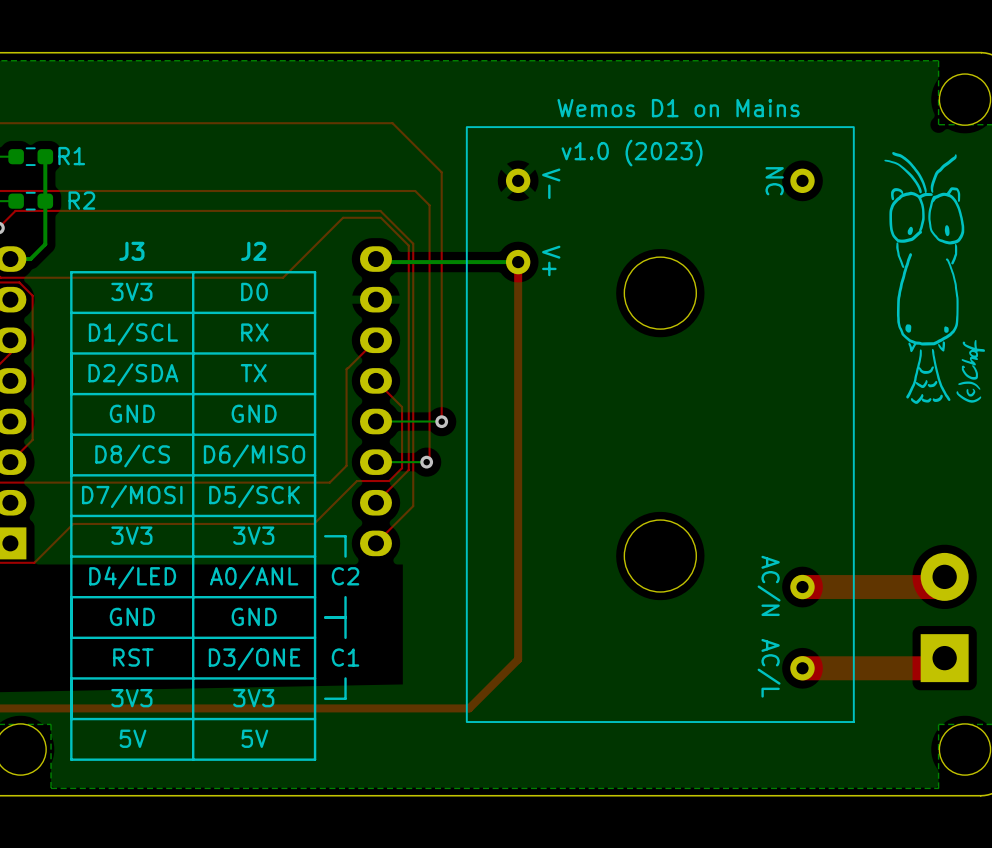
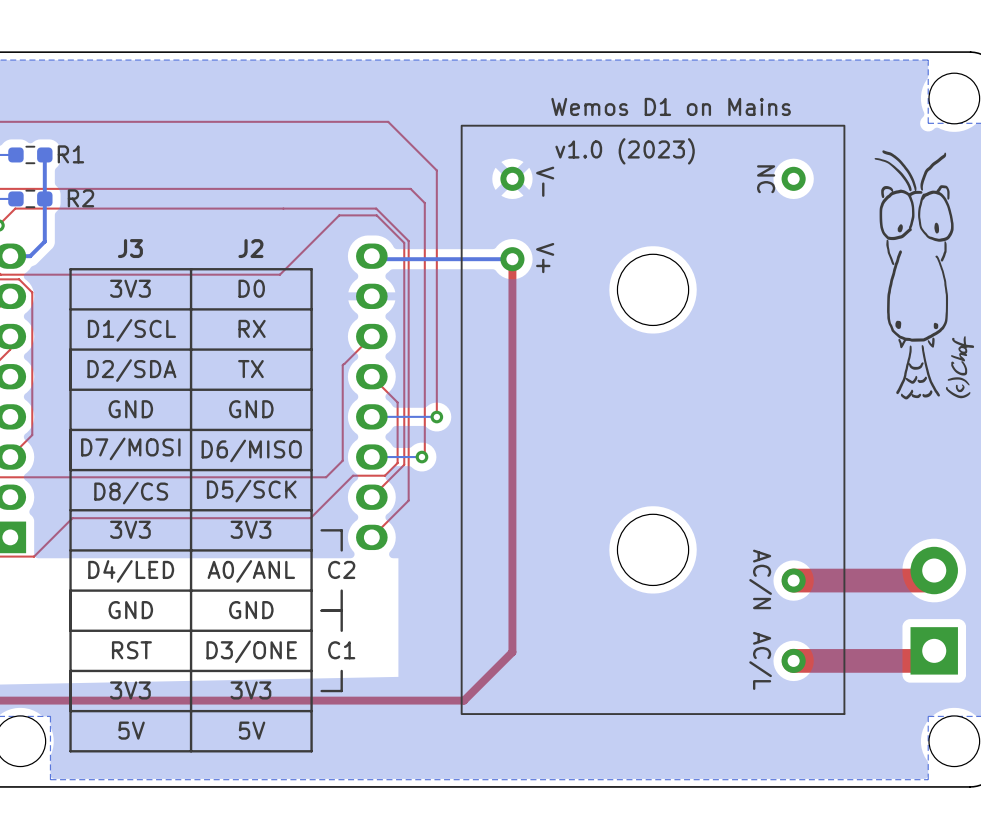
text: D8/CS (132, 455) -> D7/MOSI (130, 448)
text: D7/MOSI (132, 496) -> D8/CS (131, 493)

